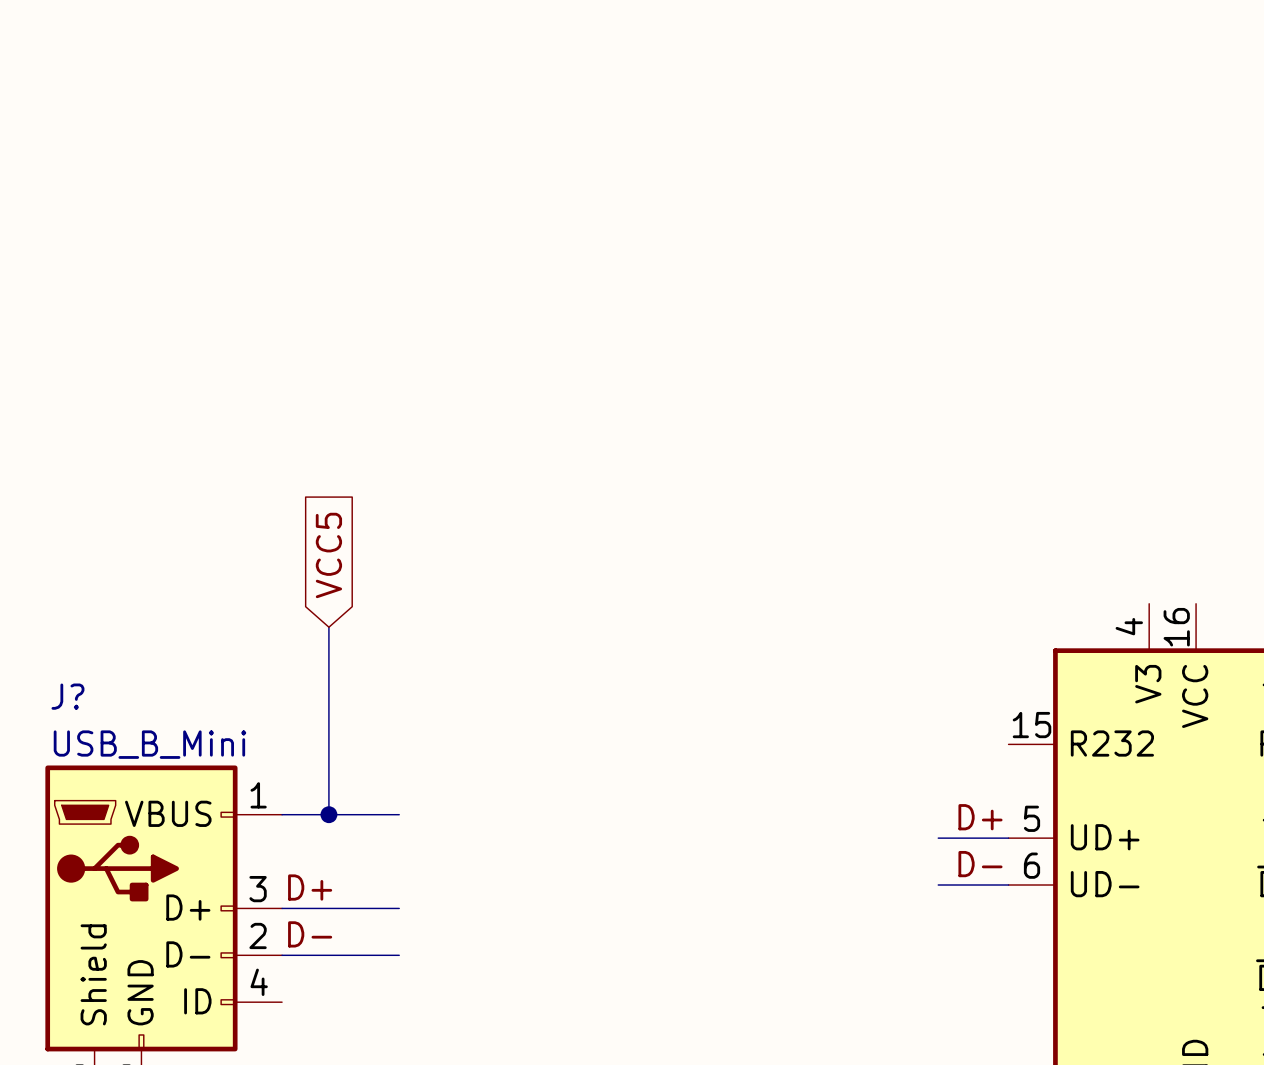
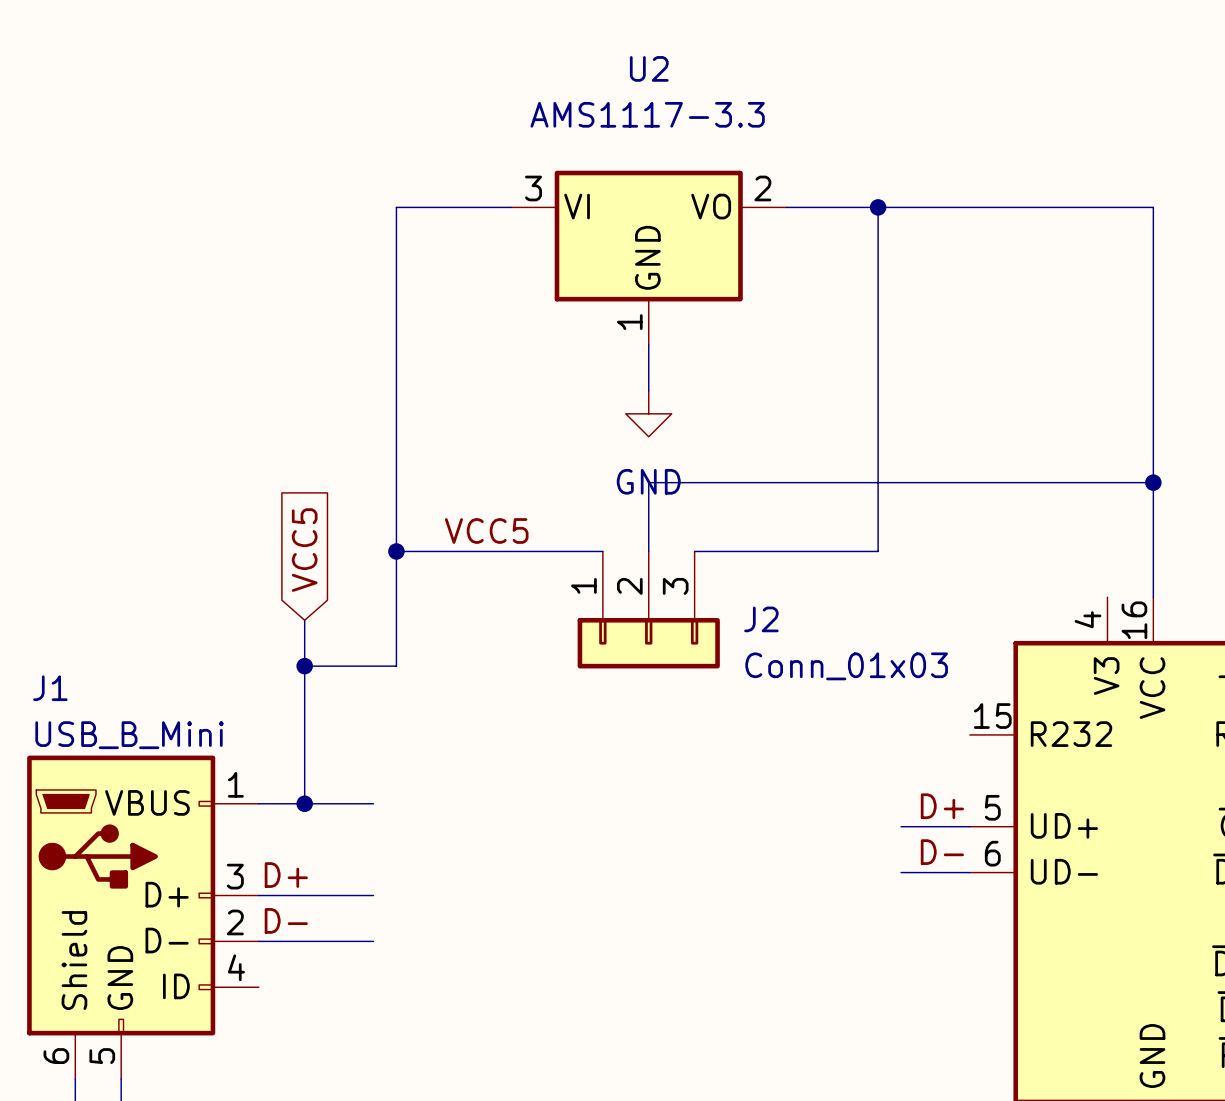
wire: none -> (511, 207) (396, 207) (396, 666) (304, 666)
wire: none -> (786, 207) (1153, 207) (1153, 597)
wire: none -> (878, 207) (878, 551) (694, 551)
junction: none -> (878, 207)
U2: none -> AMS1117-3.3 (648, 257)
wire: none -> (648, 345) (648, 390)
power symbol: none -> GND (648, 413)
wire: none -> (1153, 482) (648, 482) (648, 551)
junction: none -> (1153, 482)
label: none -> VCC5 (486, 530)
wire: none -> (396, 551) (602, 551)
junction: none -> (396, 551)
J2: none -> Conn_01x03 (648, 609)
junction: none -> (304, 666)
J? name: J? (67, 696) -> J1 (50, 688)

